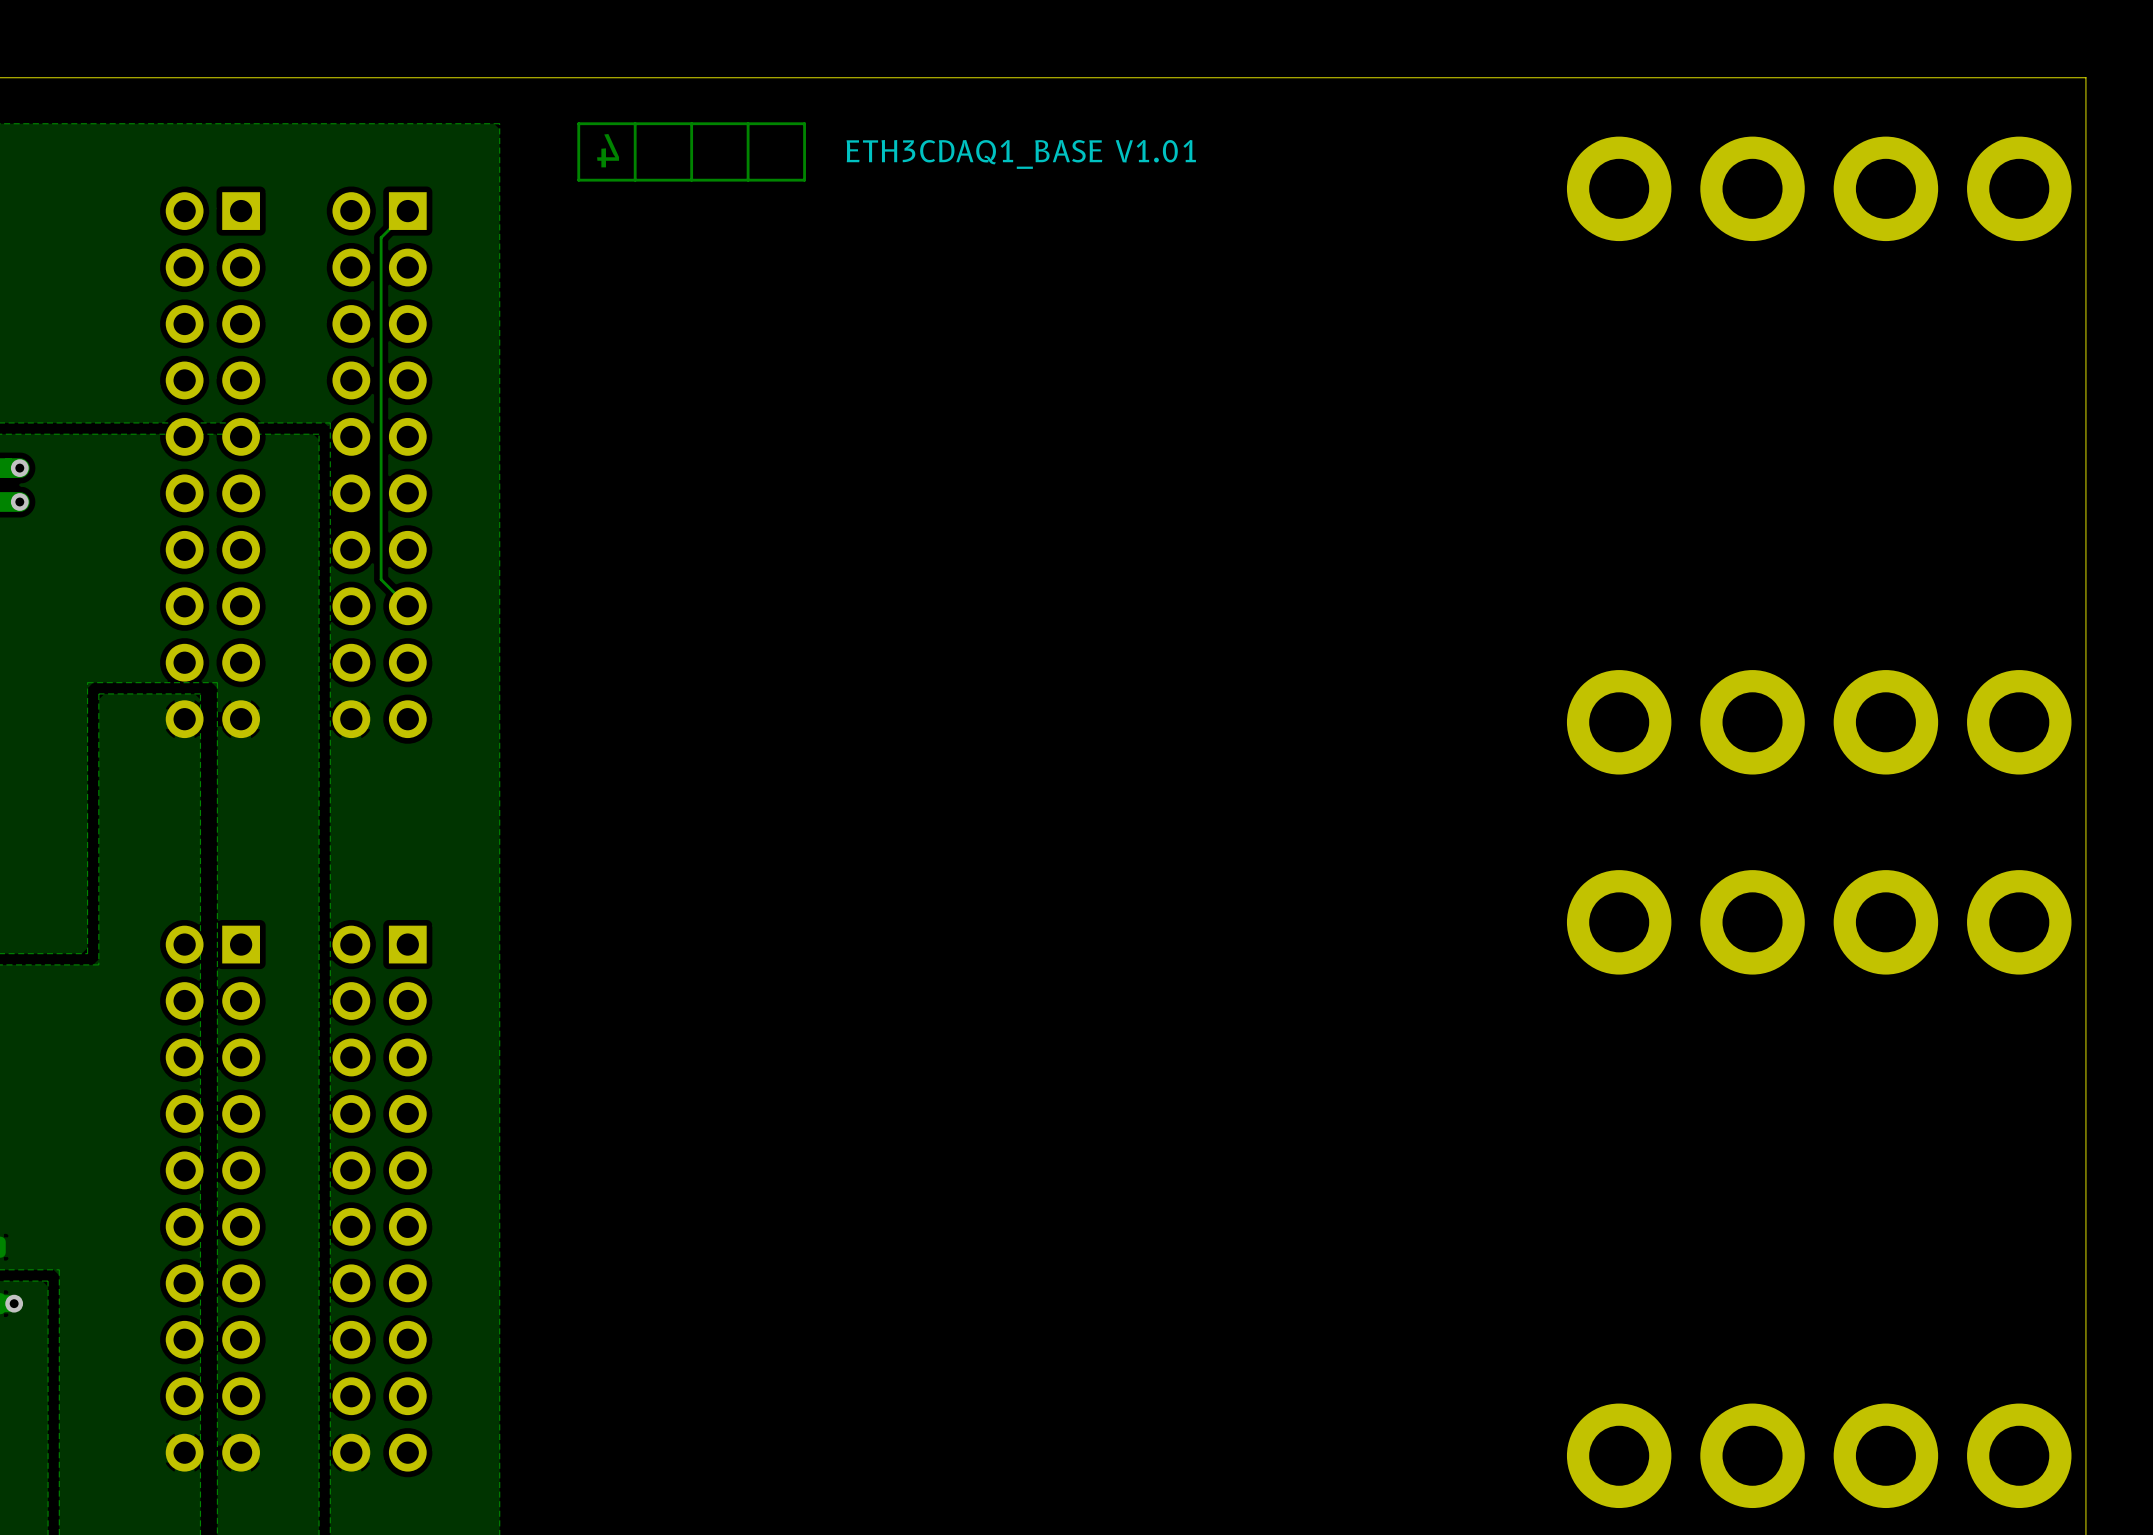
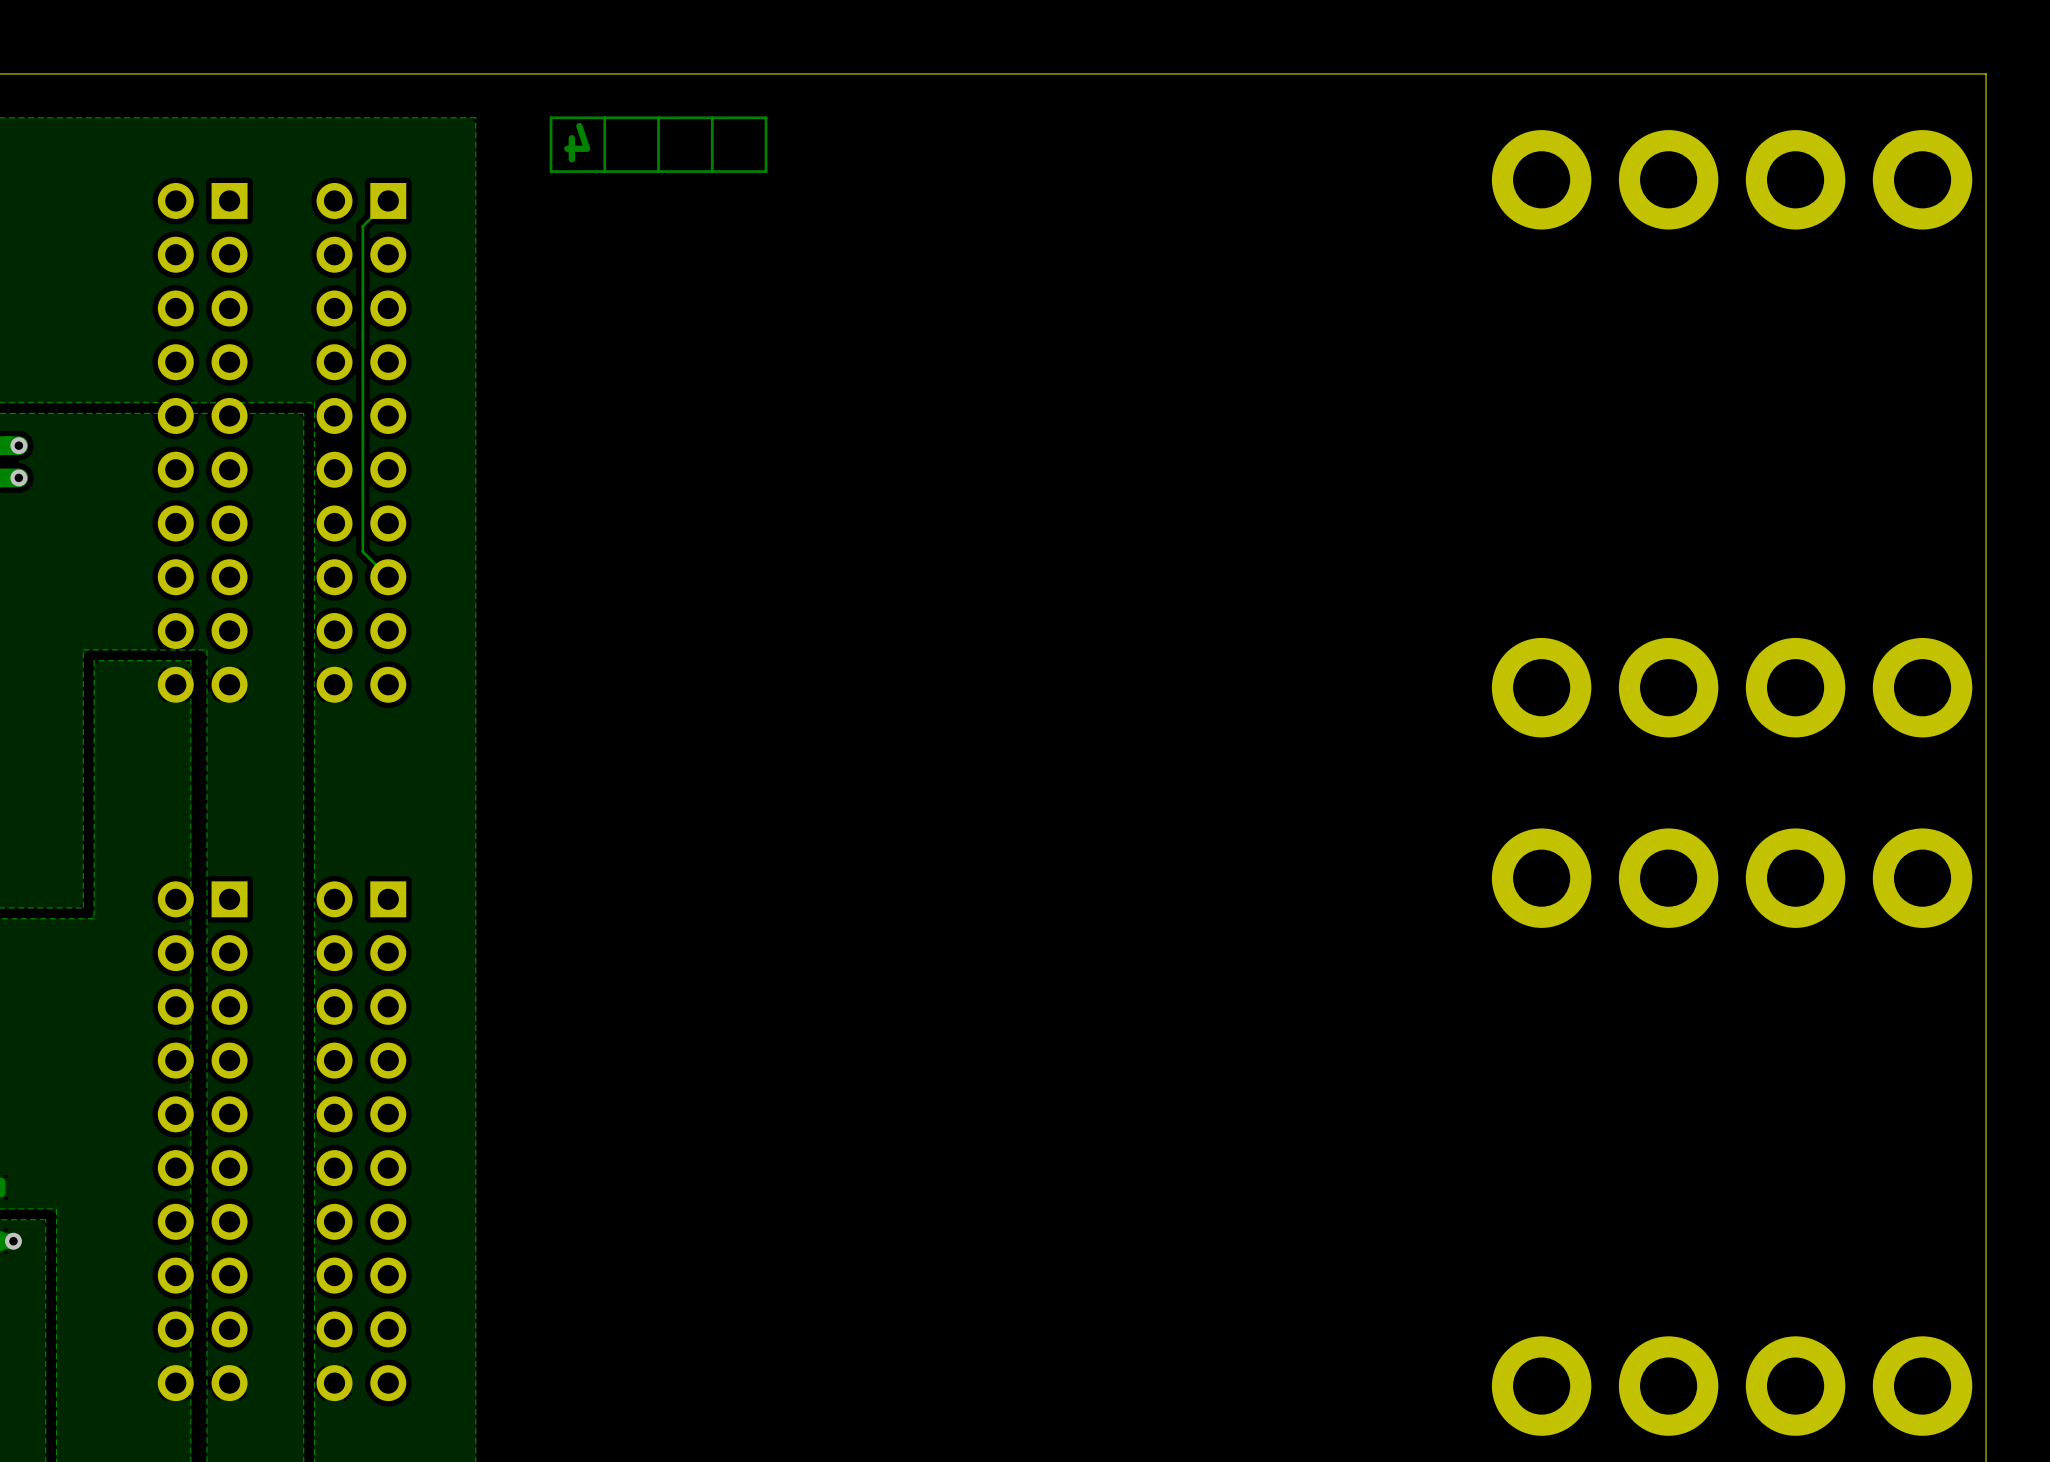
text: ETH3CDAQ1_BASE V1.01 (1021, 154) -> none

